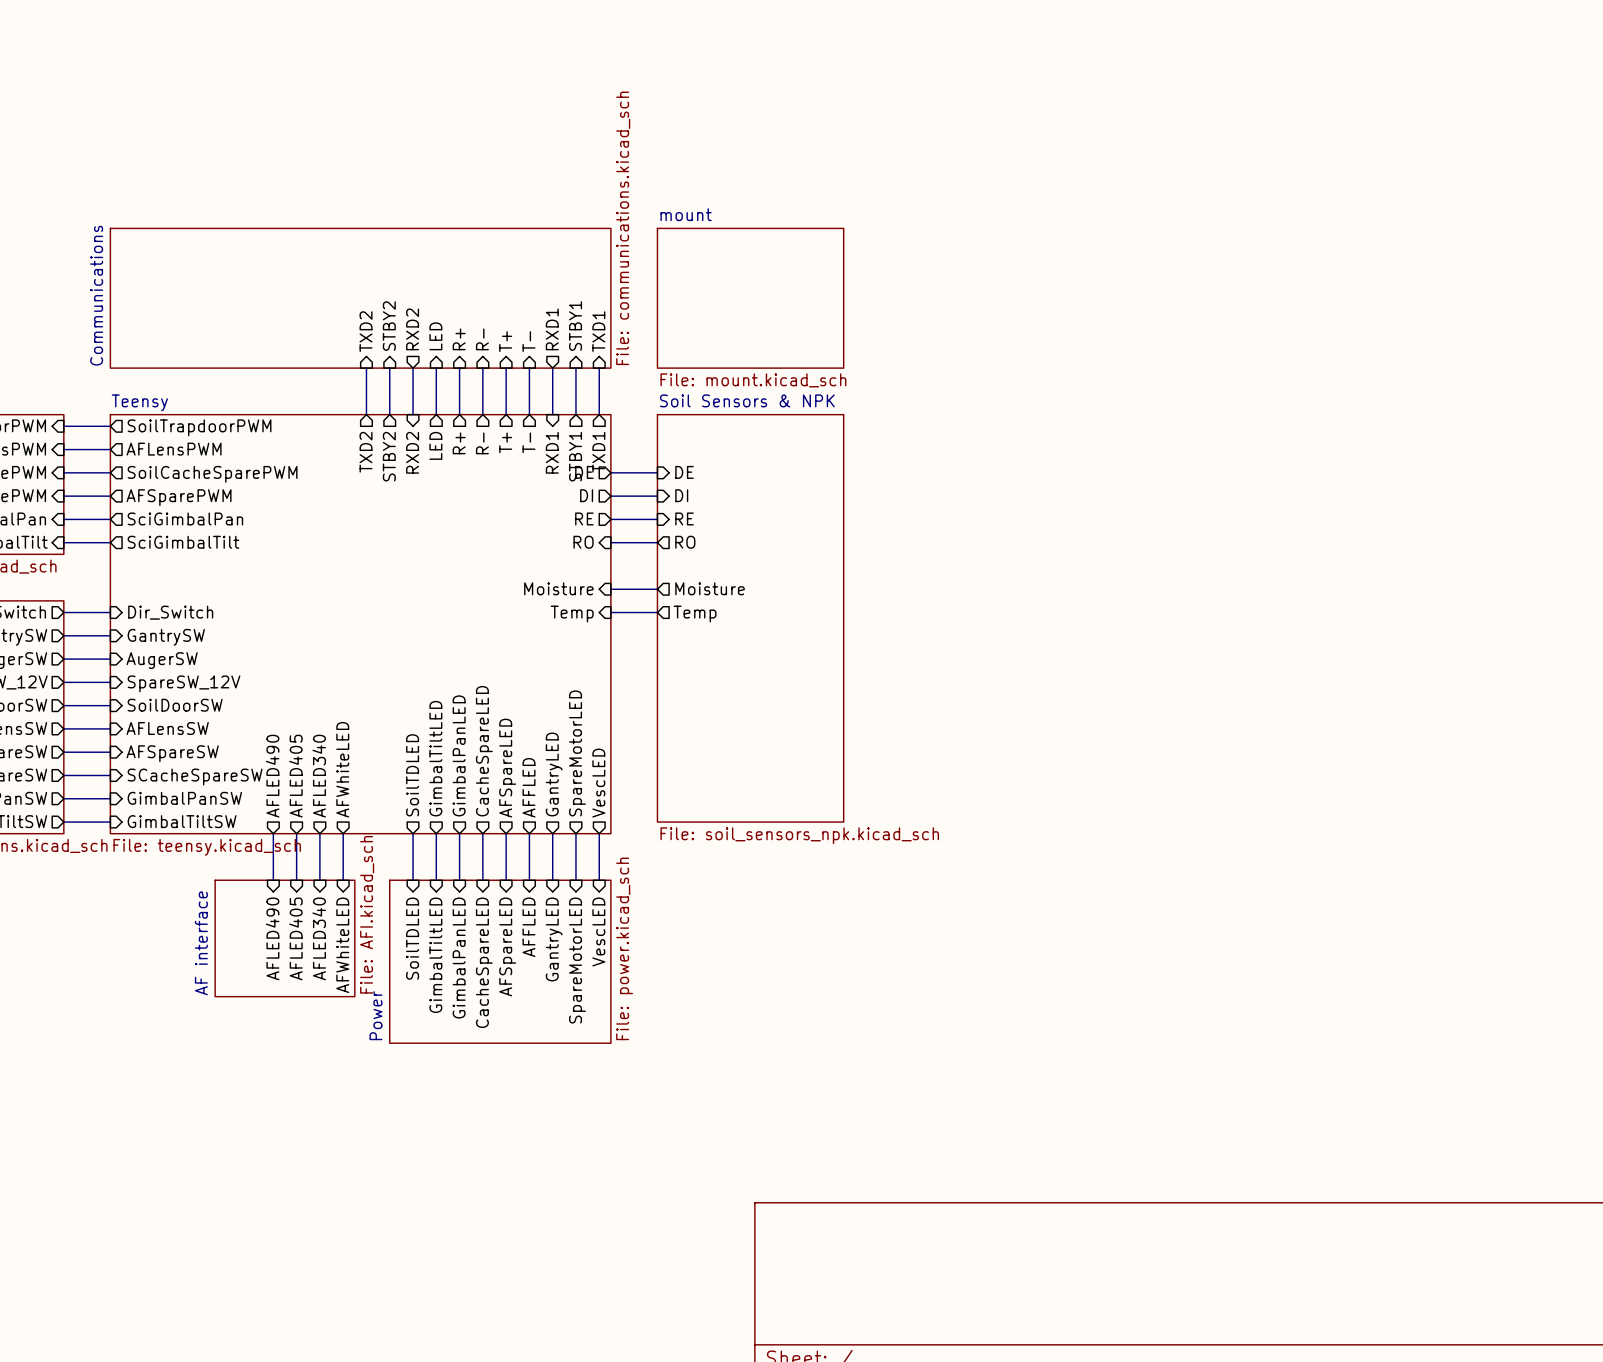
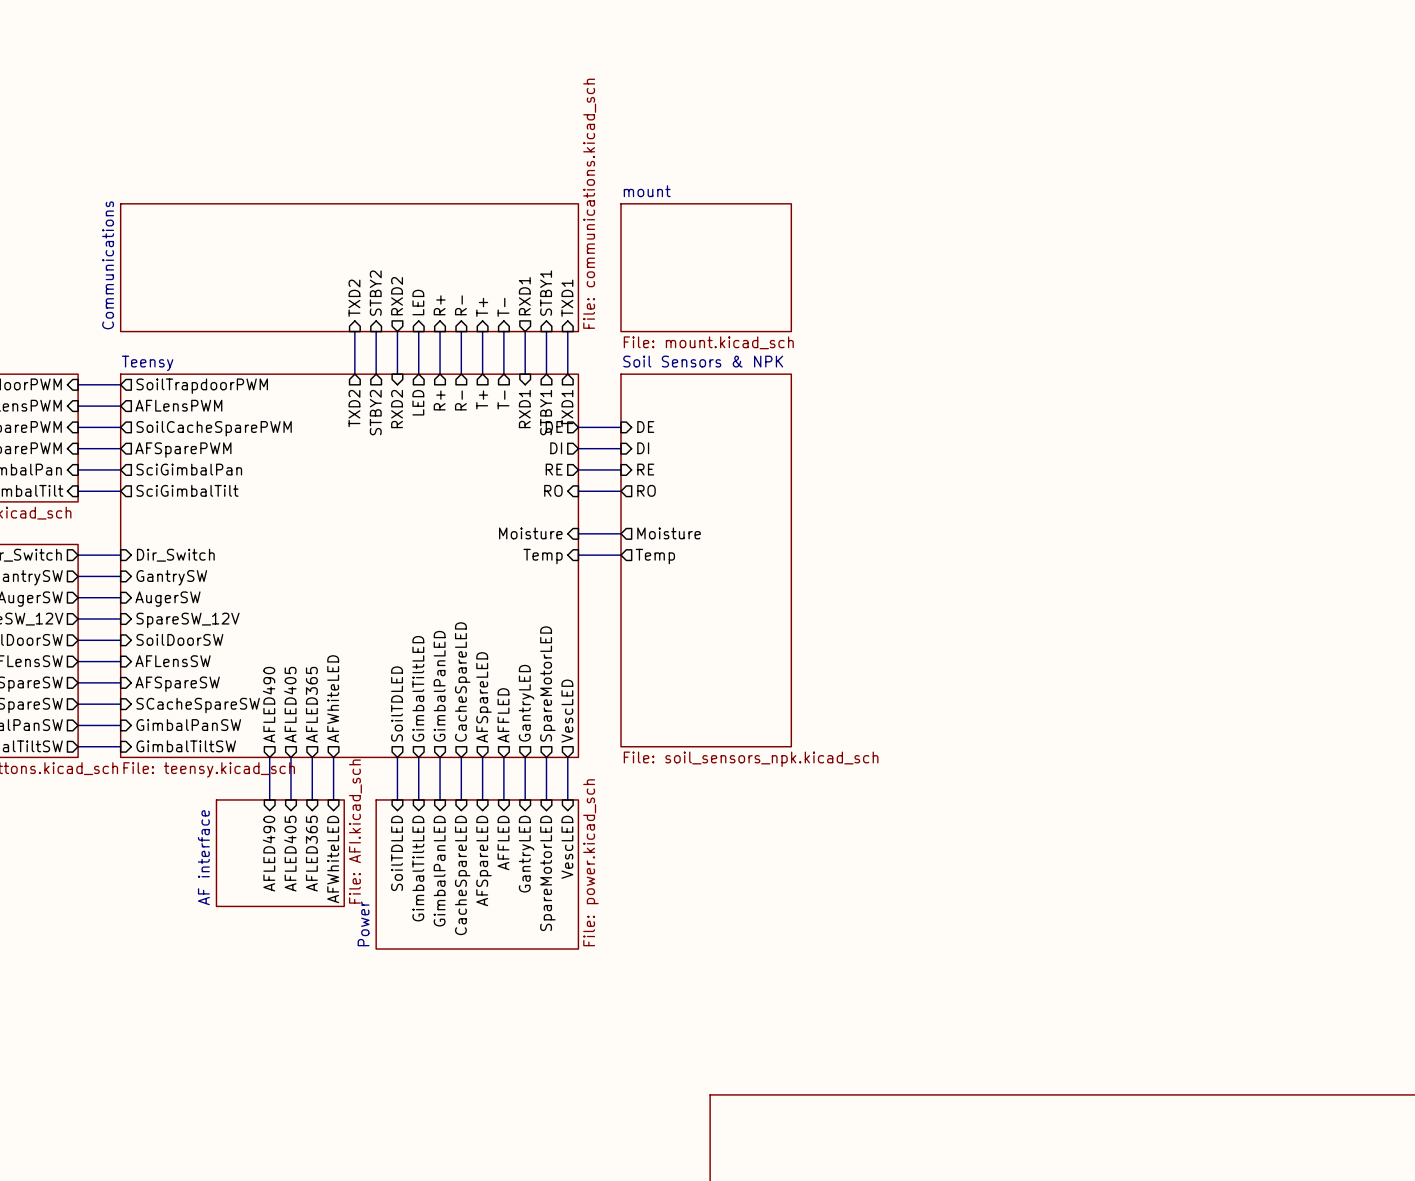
sheet pin: AFLED340 (319, 776) -> AFLED365 (311, 704)
sheet pin: AFLED340 (319, 938) -> AFLED365 (311, 853)

